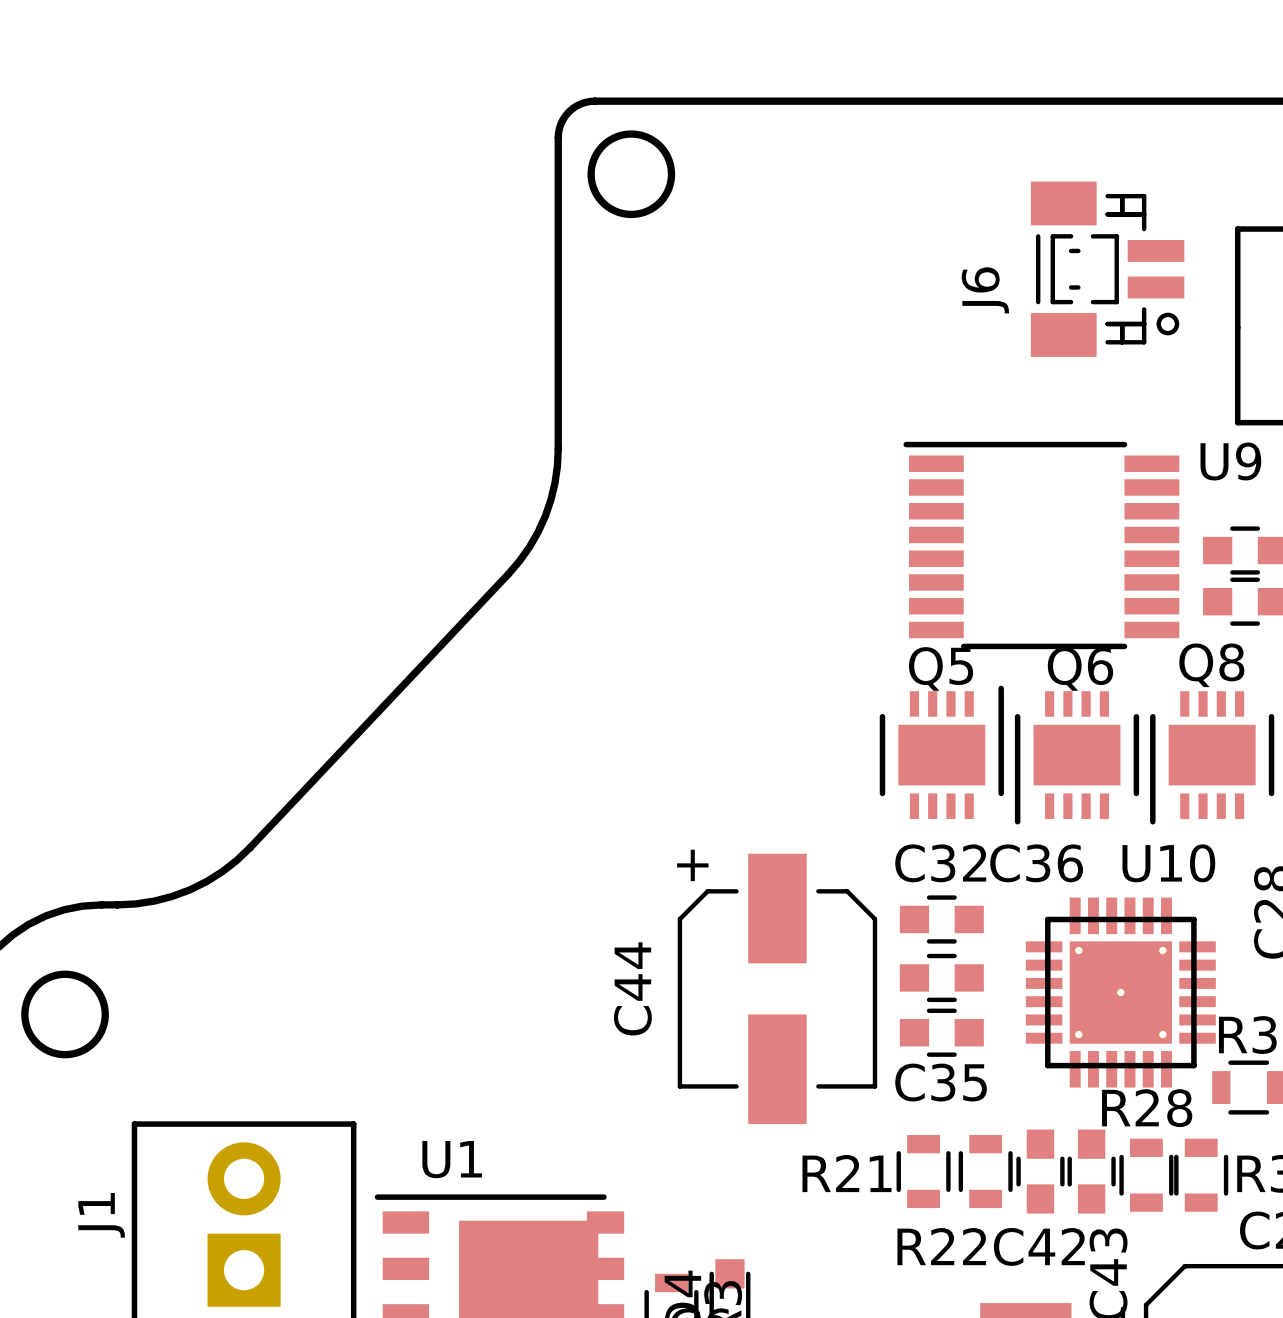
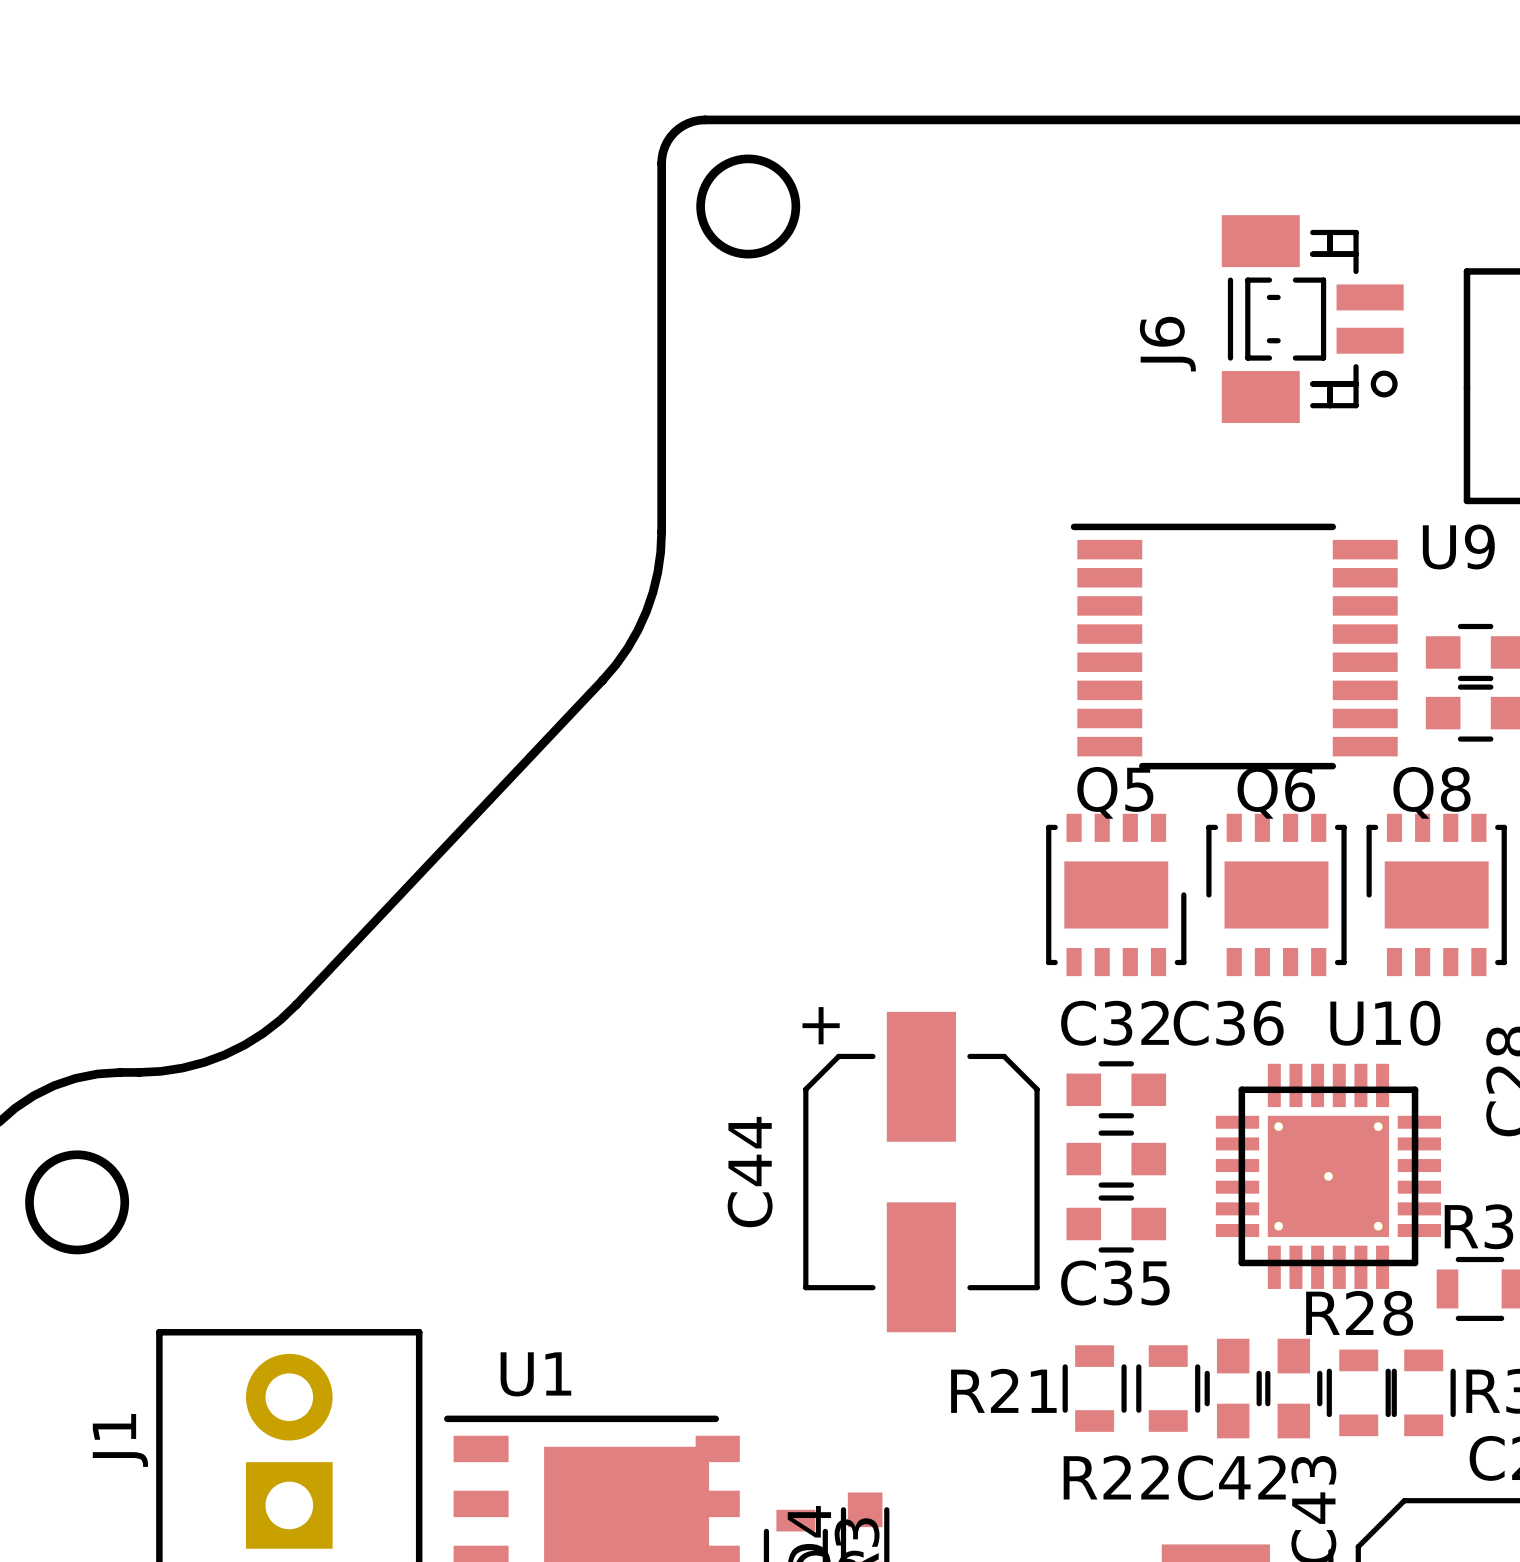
Q5 footprint: [879, 685, 1004, 820] -> [1046, 813, 1187, 977]
Q6 footprint: [1014, 691, 1140, 825] -> [1206, 813, 1347, 977]
Q8 footprint: [1150, 691, 1275, 825] -> [1366, 813, 1507, 977]

